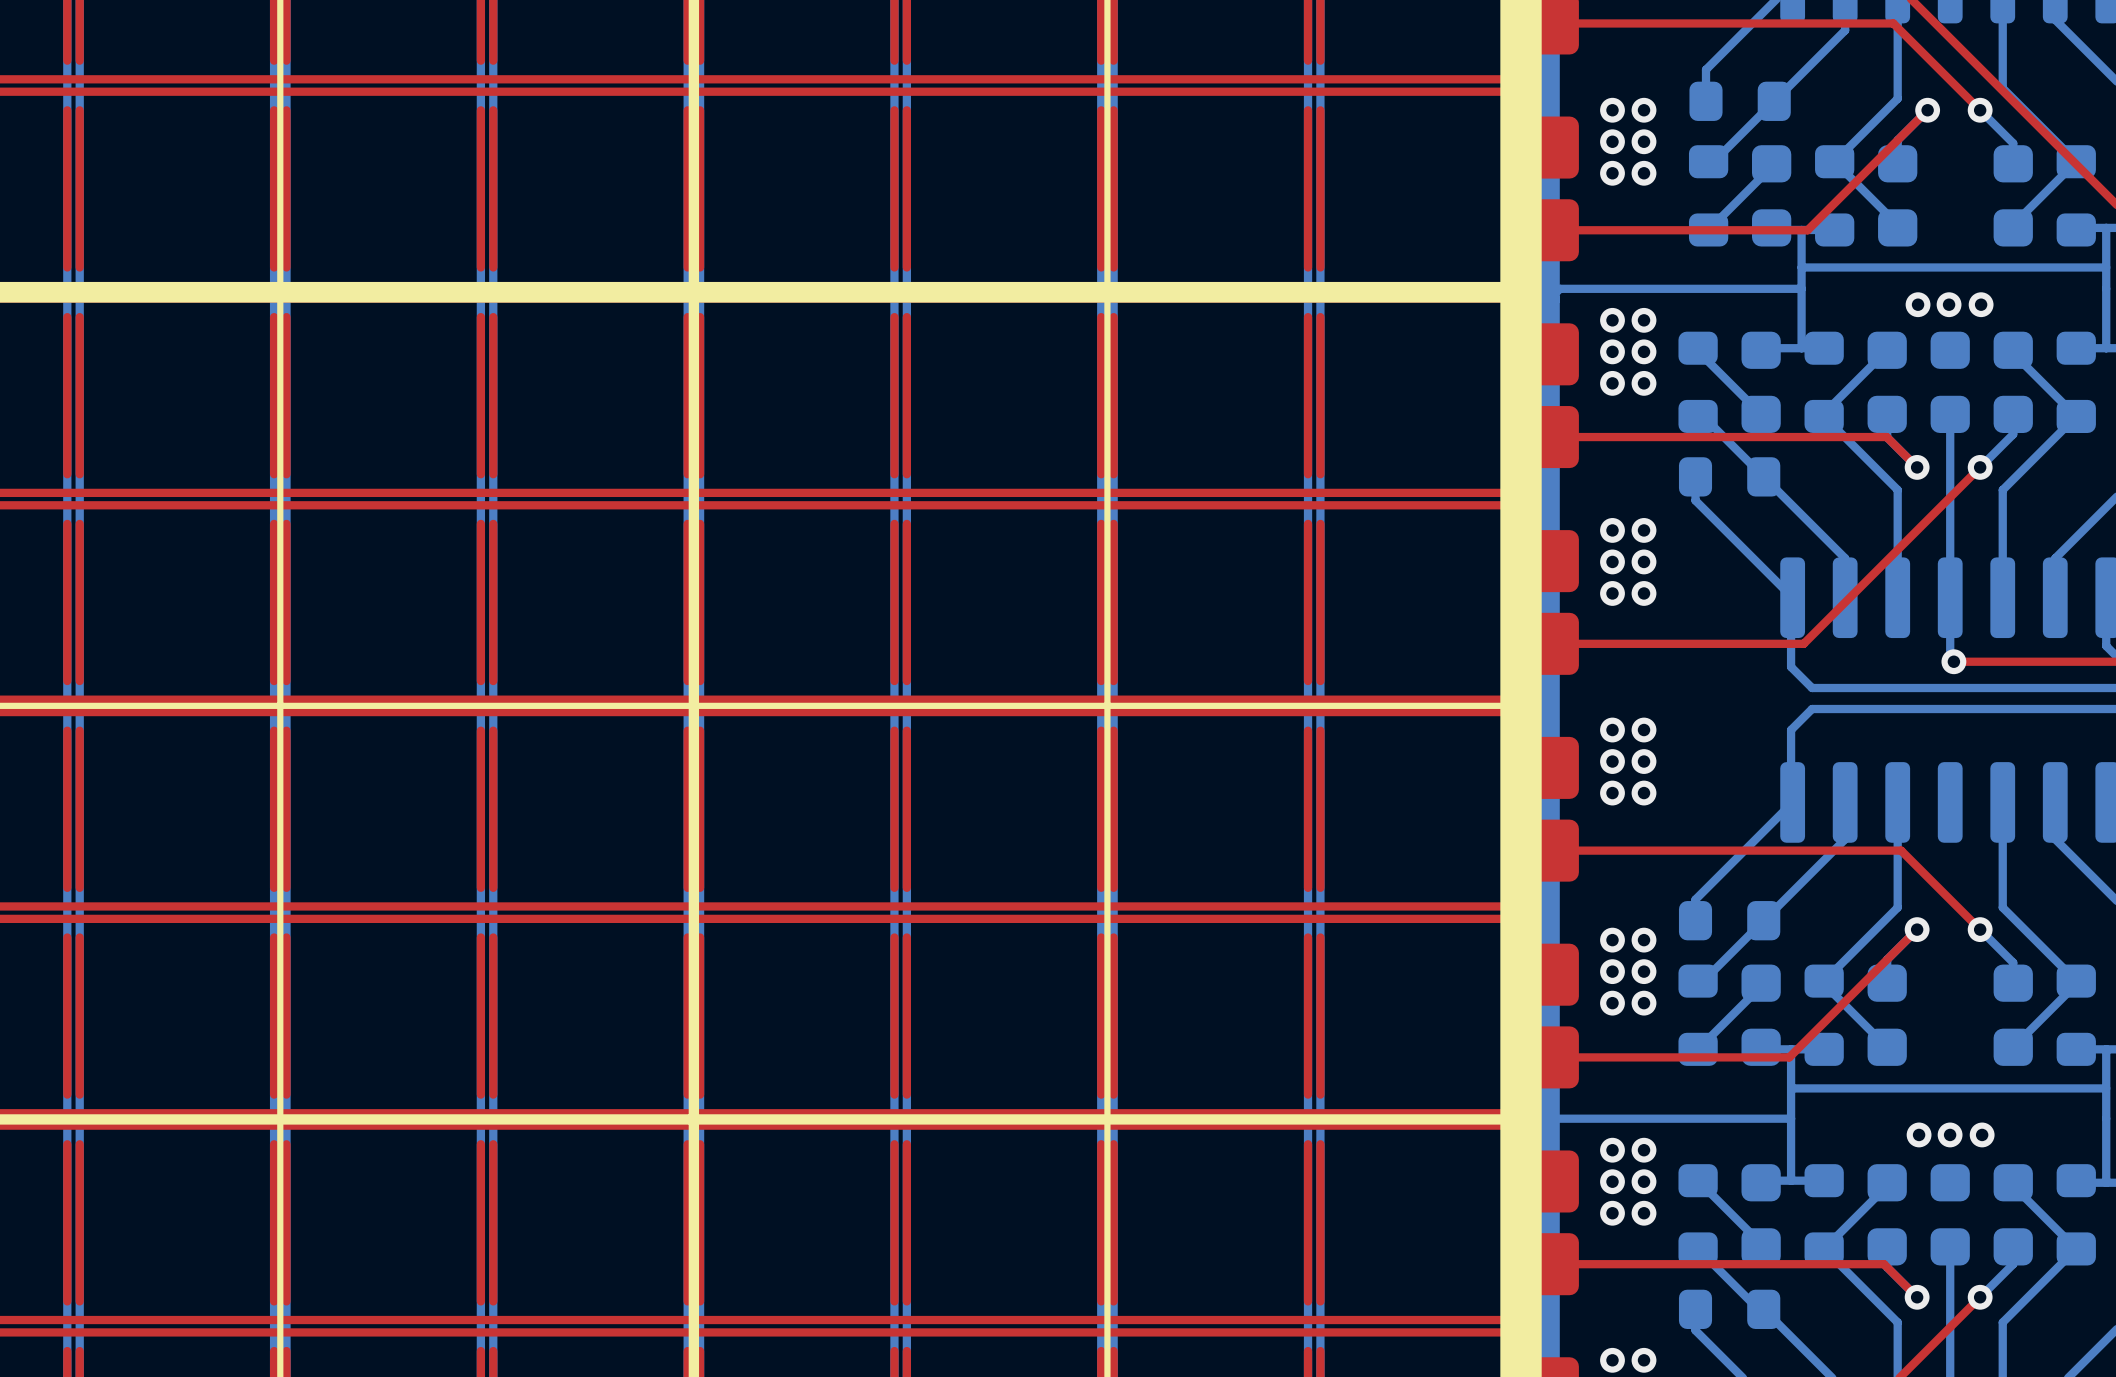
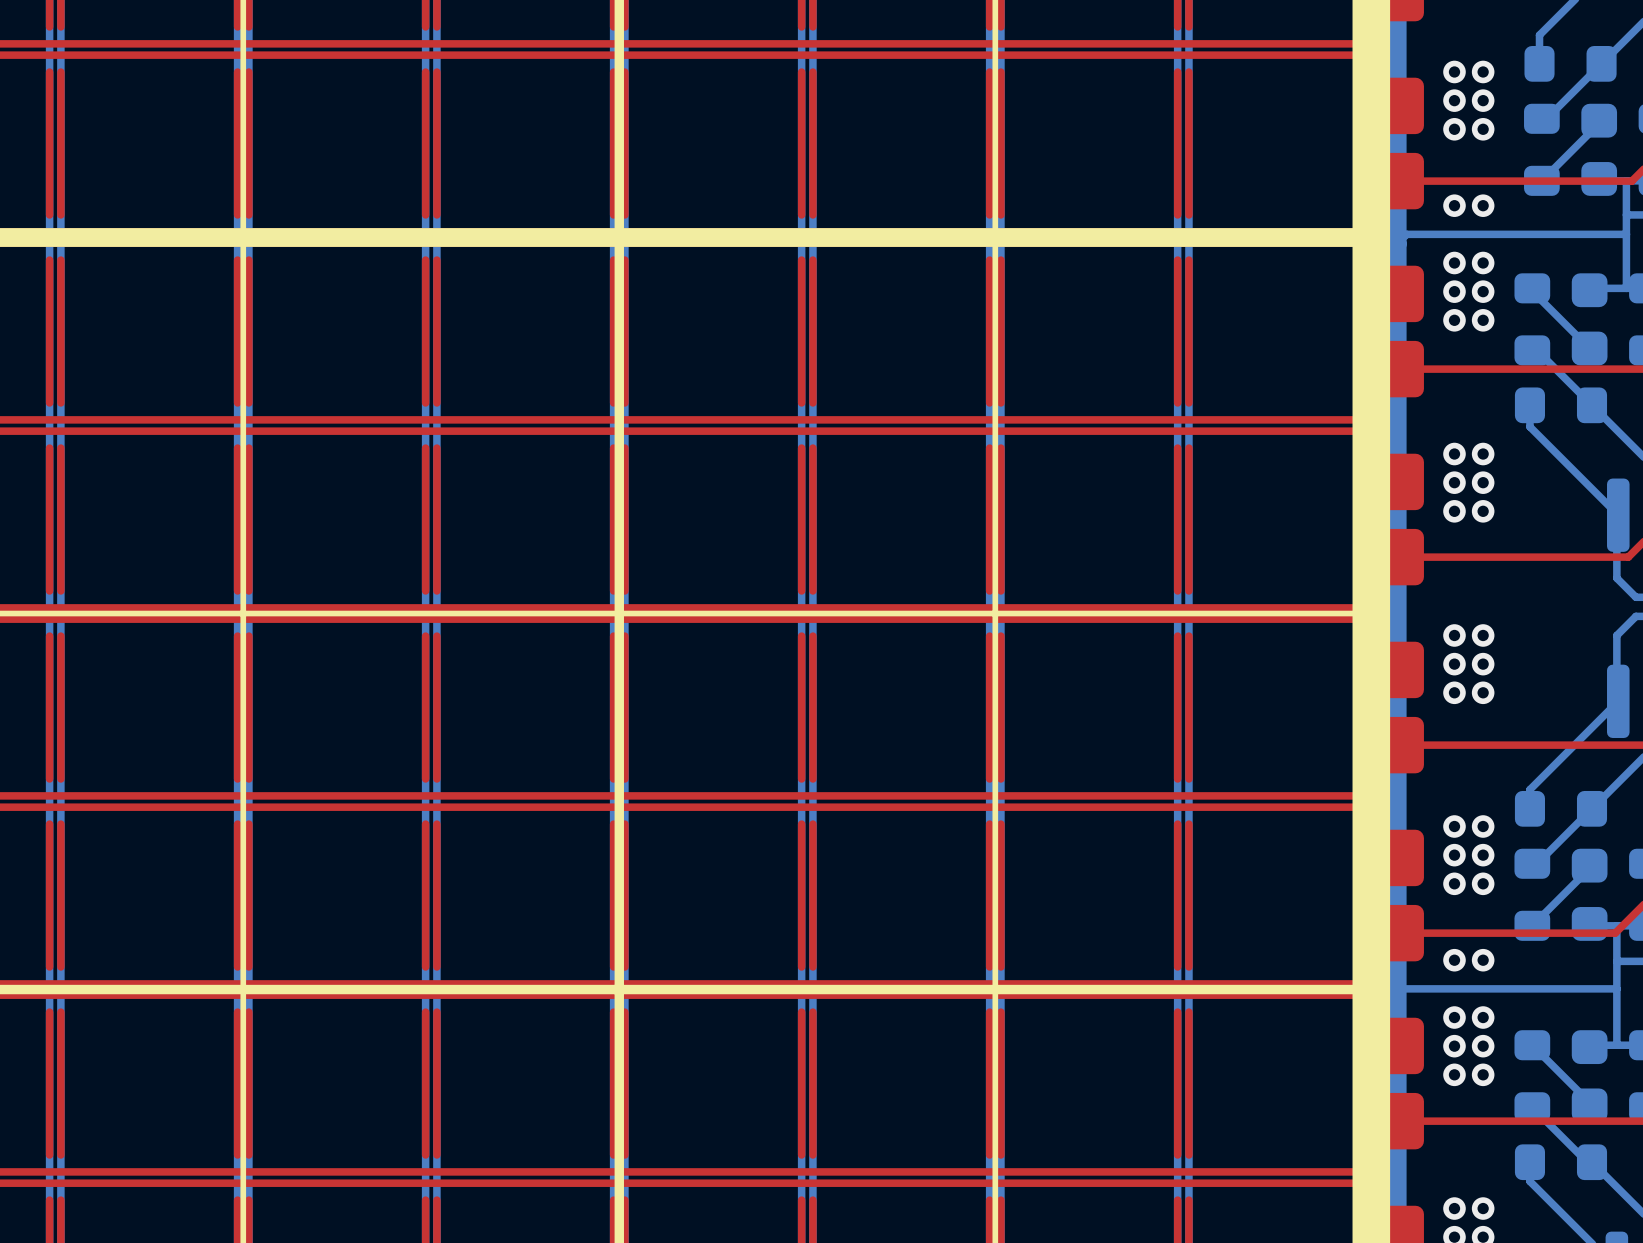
via: none -> (1454, 205)
via: none -> (1483, 205)
via: none -> (1454, 960)
via: none -> (1483, 960)

